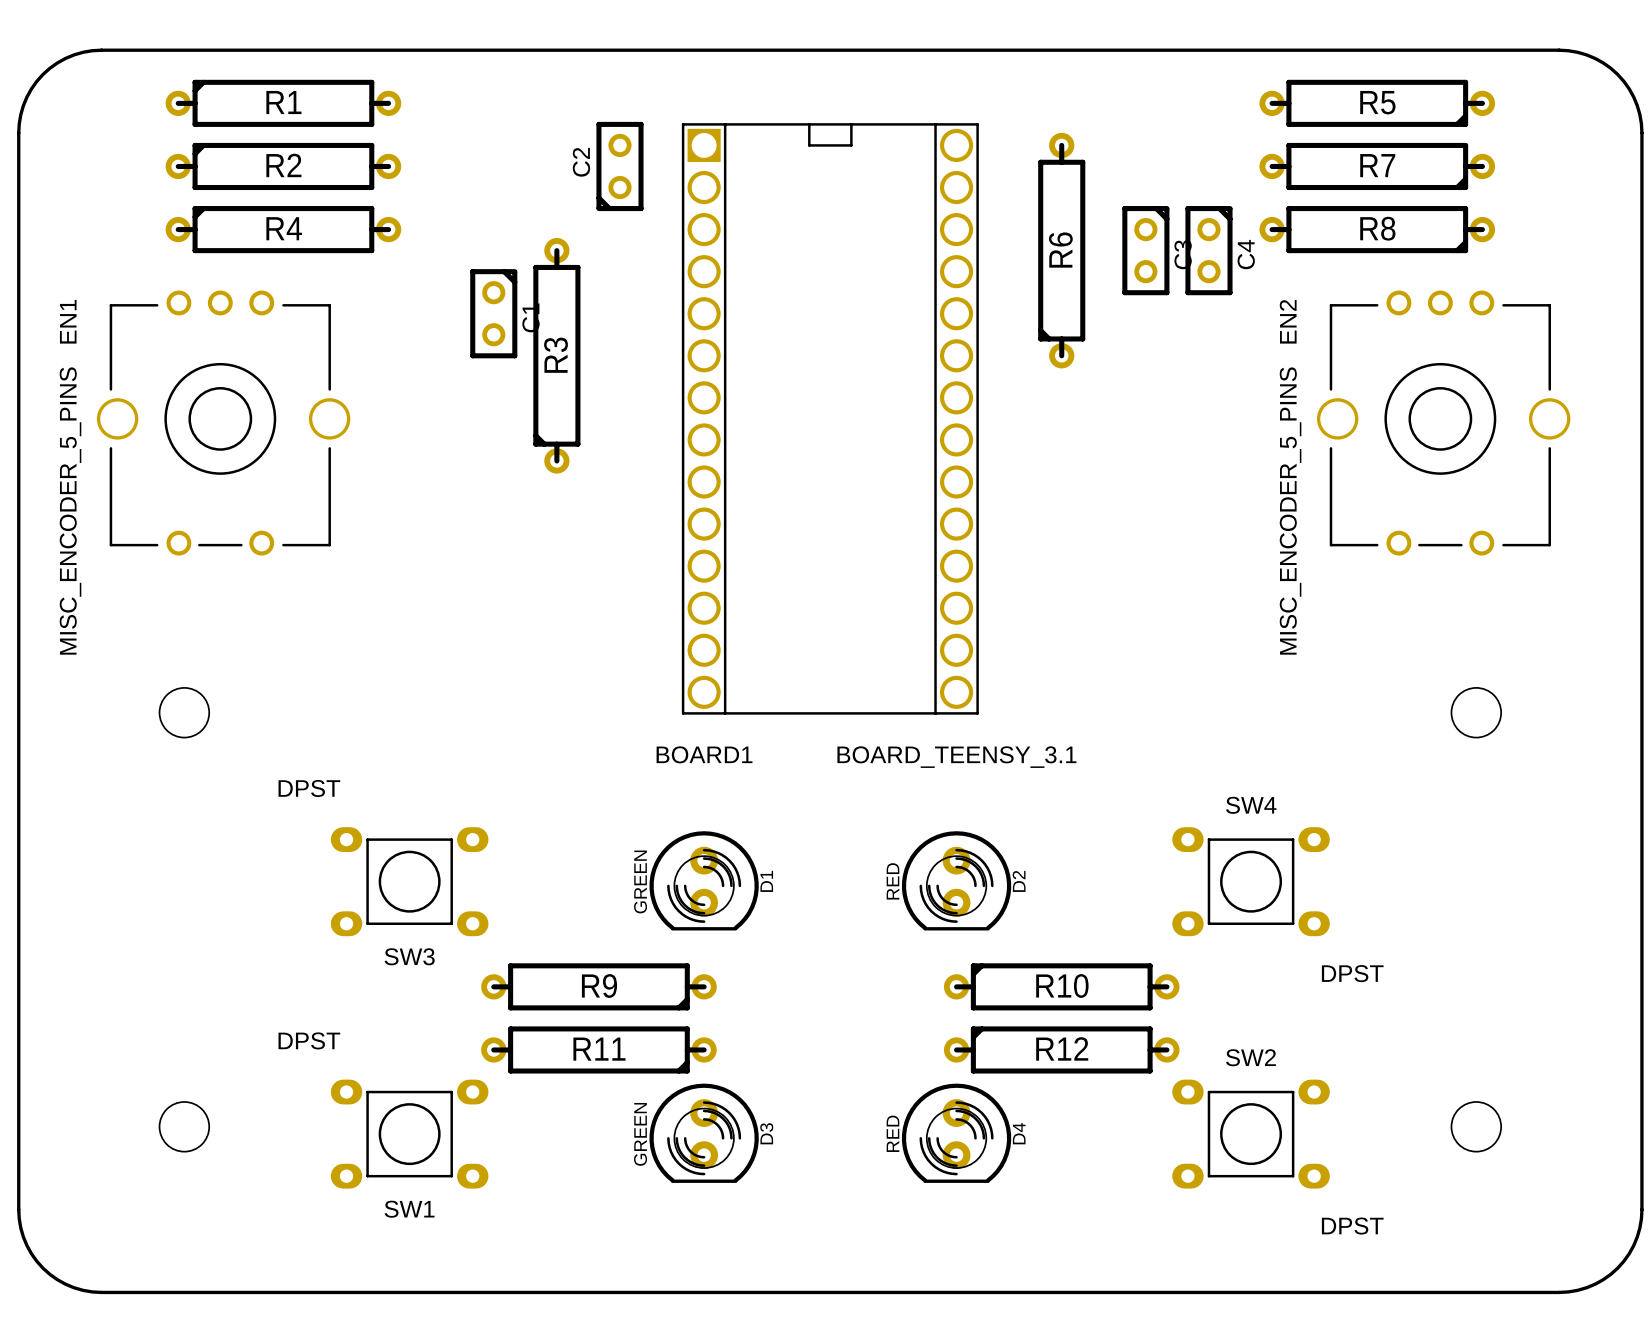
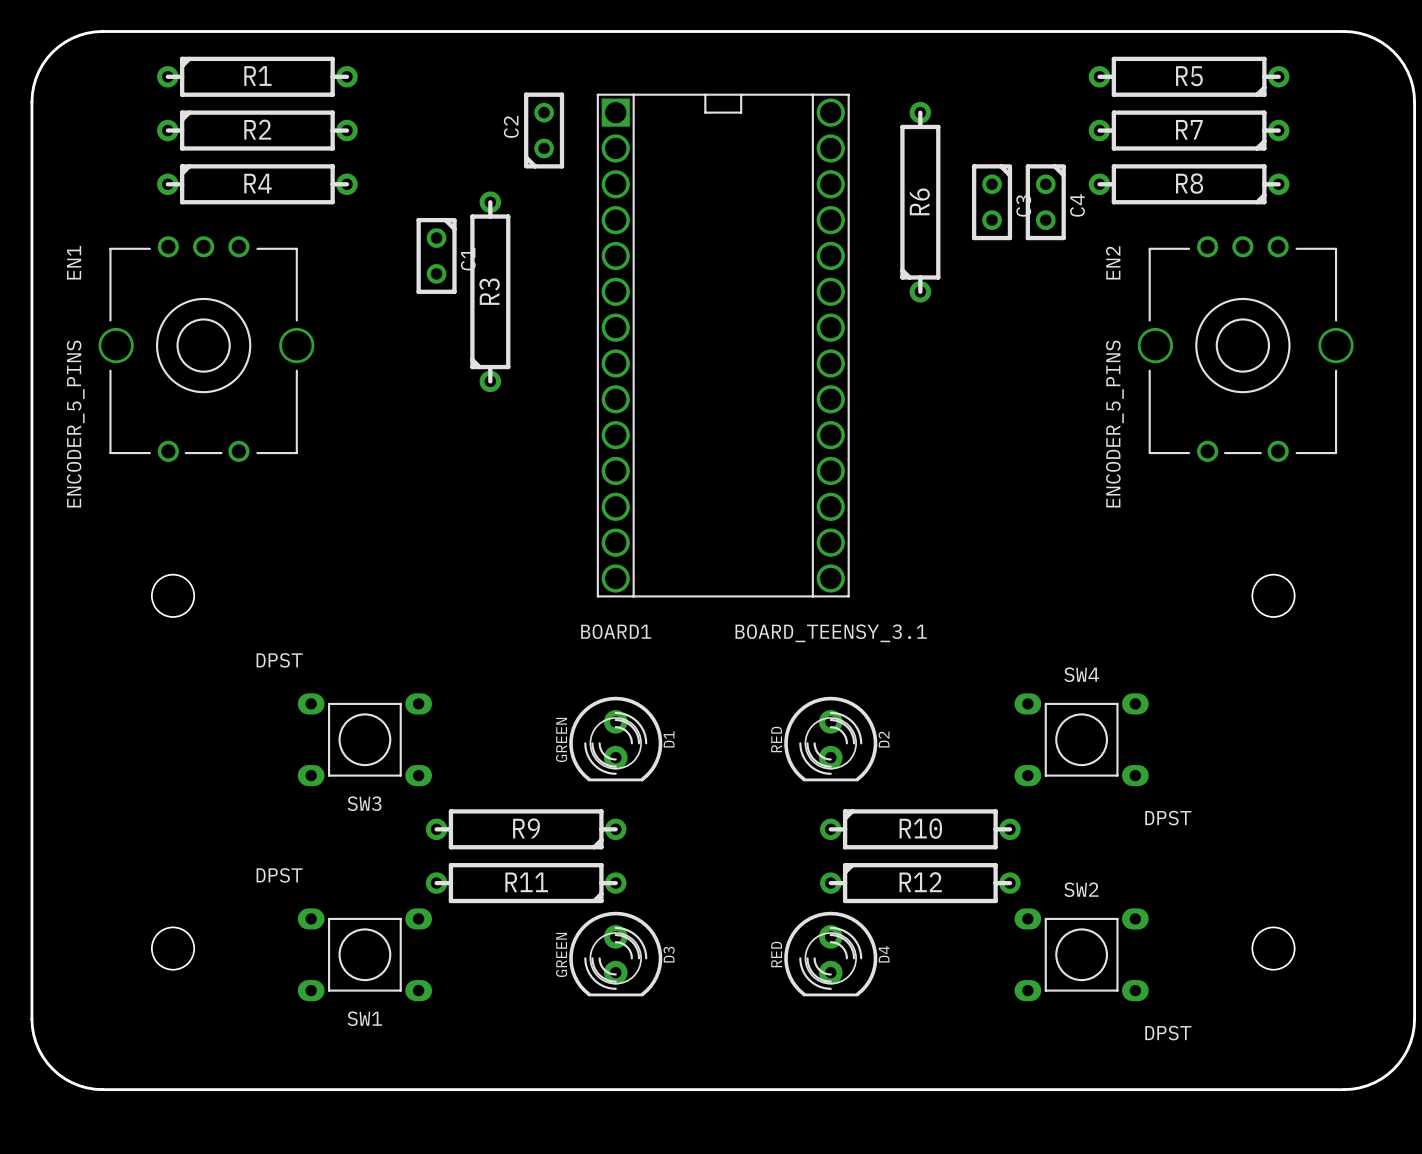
EN1 value: MISC_ENCODER_5_PINS (70, 511) -> ENCODER_5_PINS (75, 424)
EN2 value: MISC_ENCODER_5_PINS (1290, 511) -> ENCODER_5_PINS (1114, 424)

